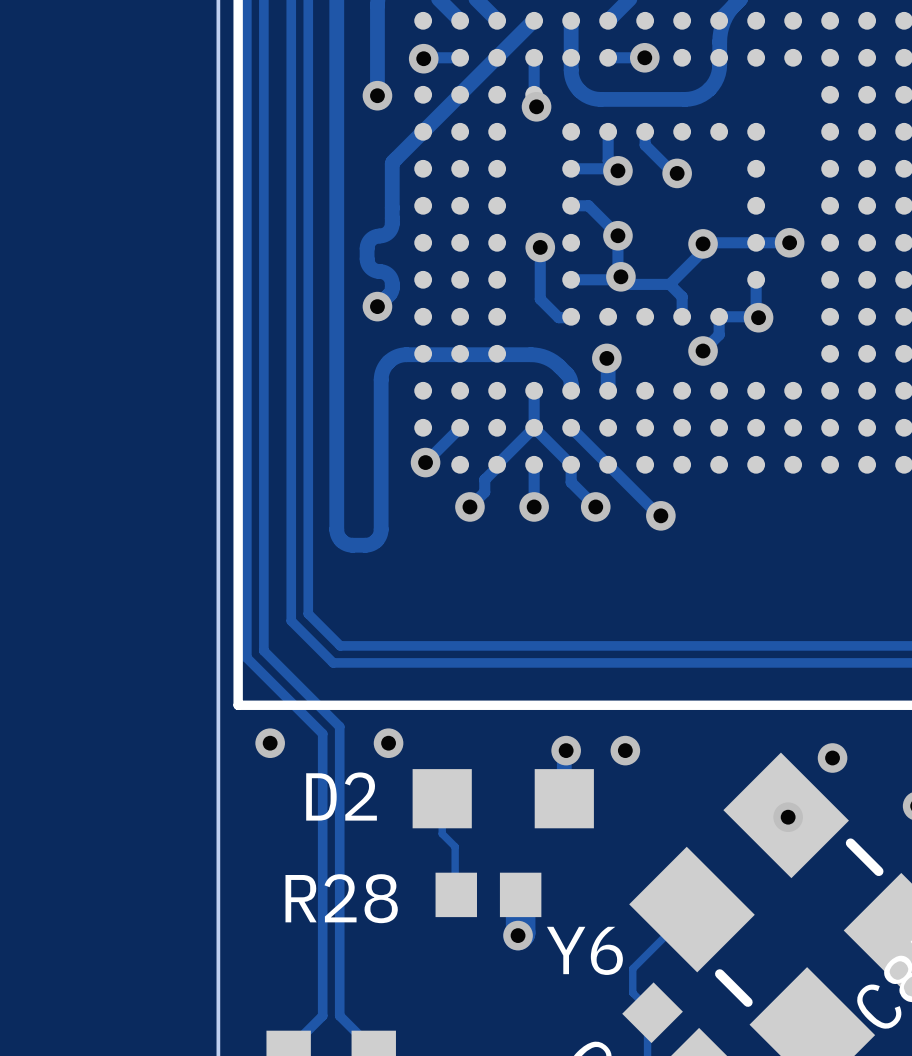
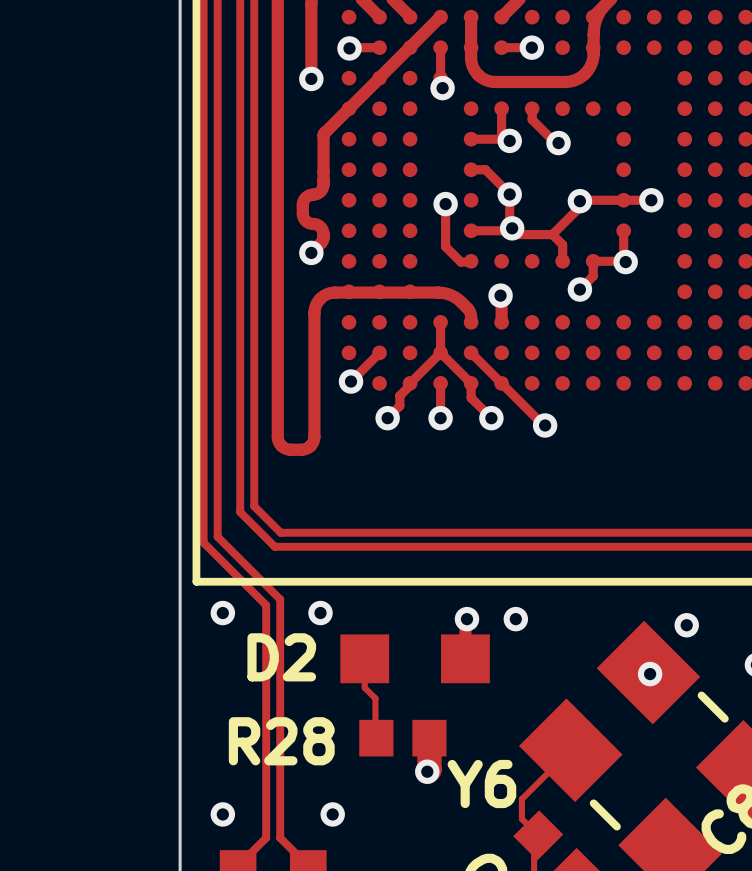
via: none -> (222, 814)
via: none -> (332, 814)

